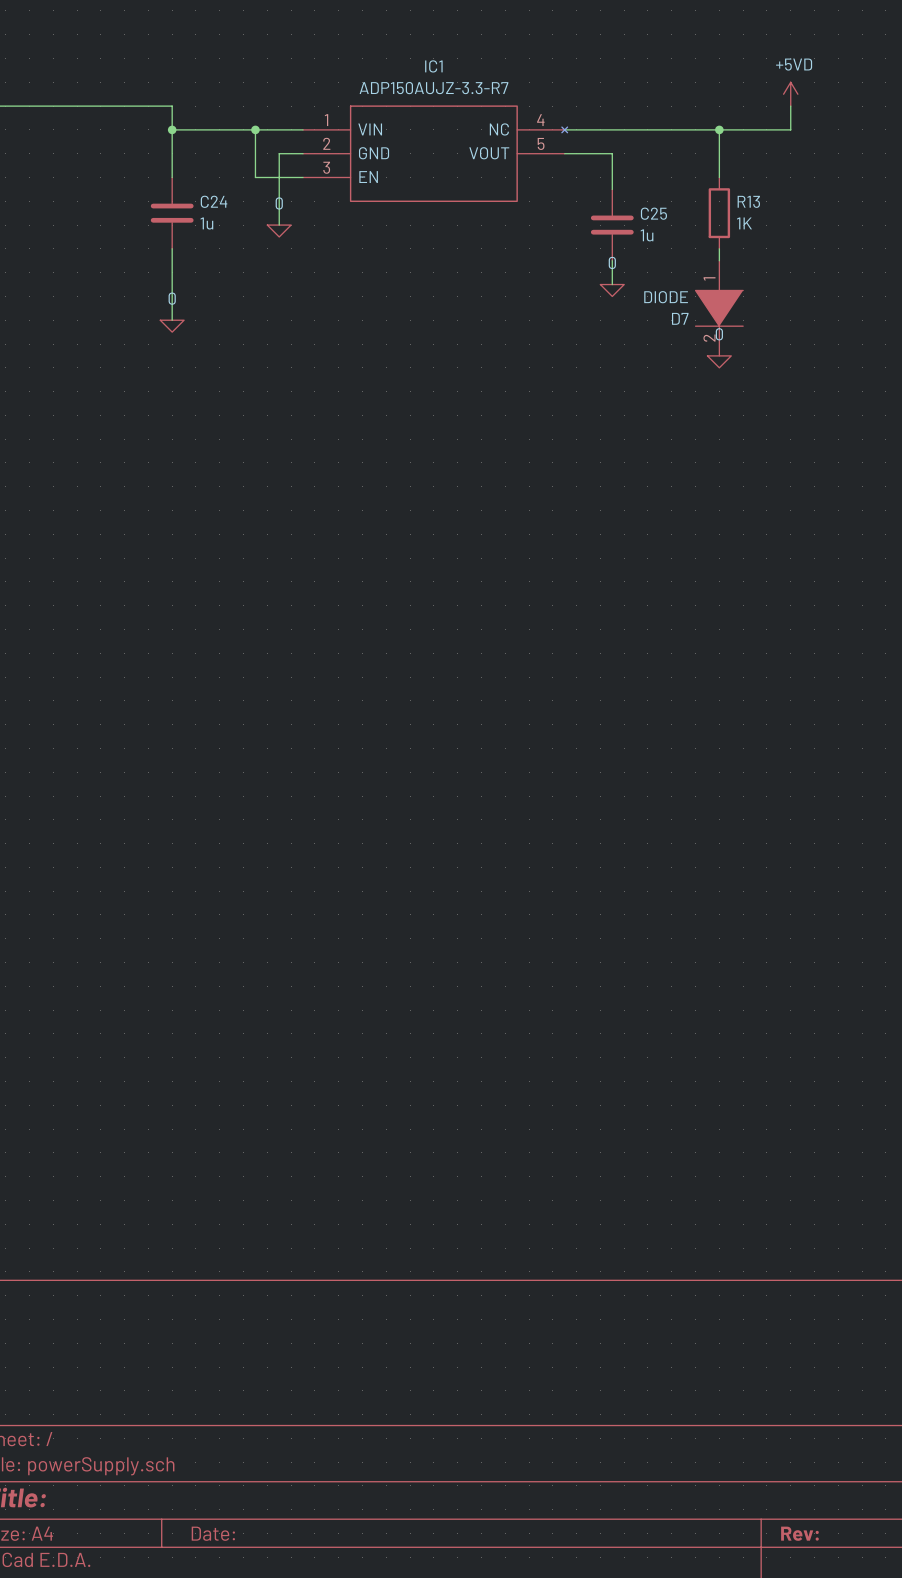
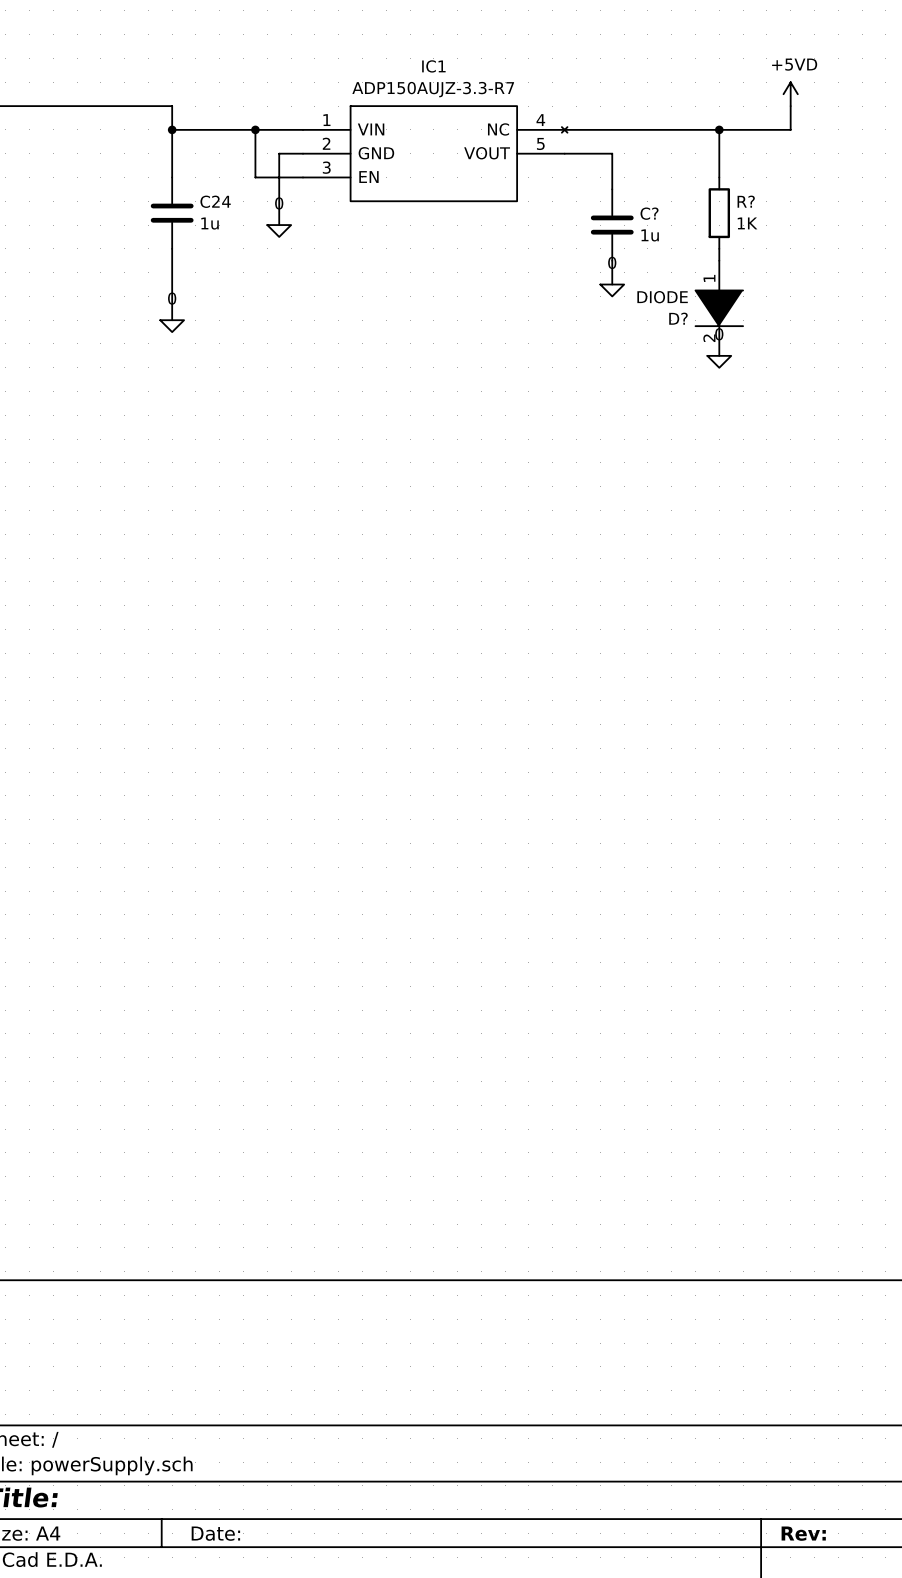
R13 name: R13 (748, 201) -> R? (746, 201)
C25 name: C25 (653, 213) -> C? (649, 213)
D7 name: D7 (680, 318) -> D? (678, 318)

